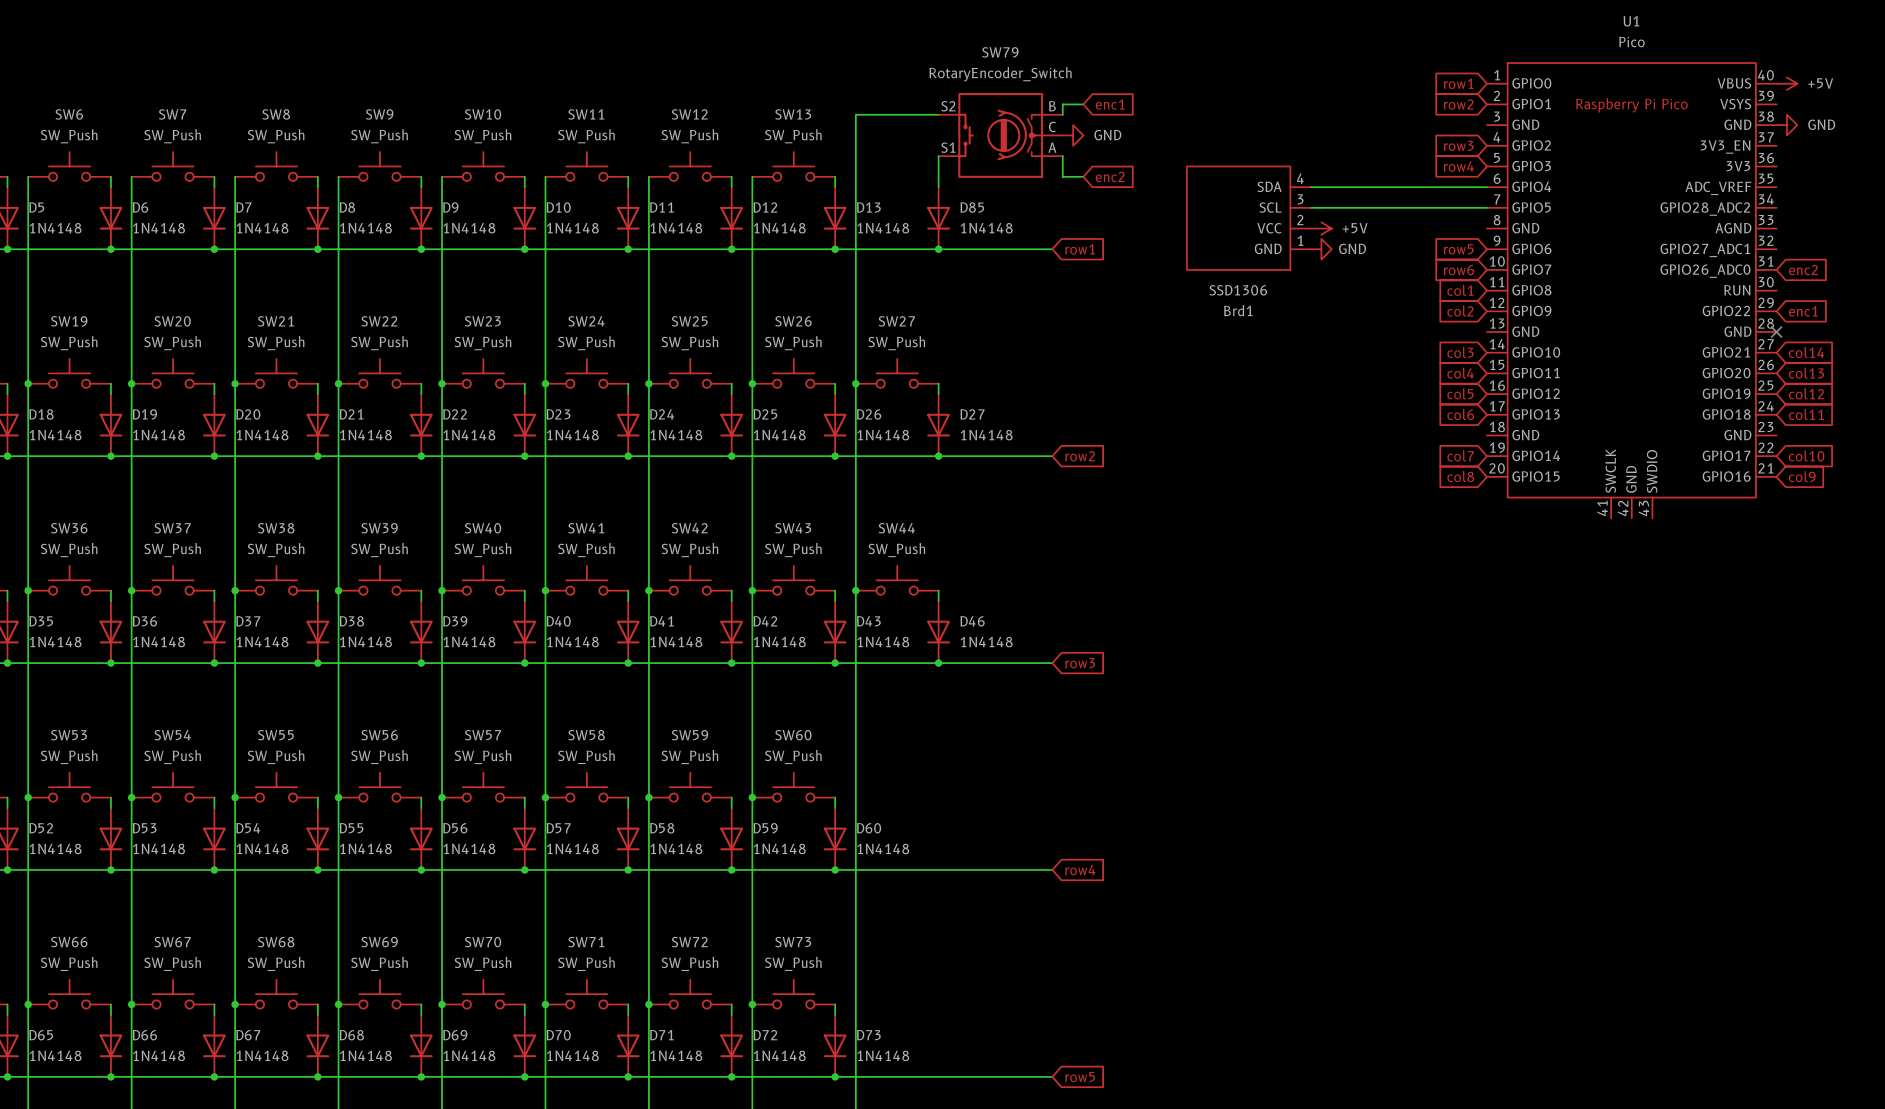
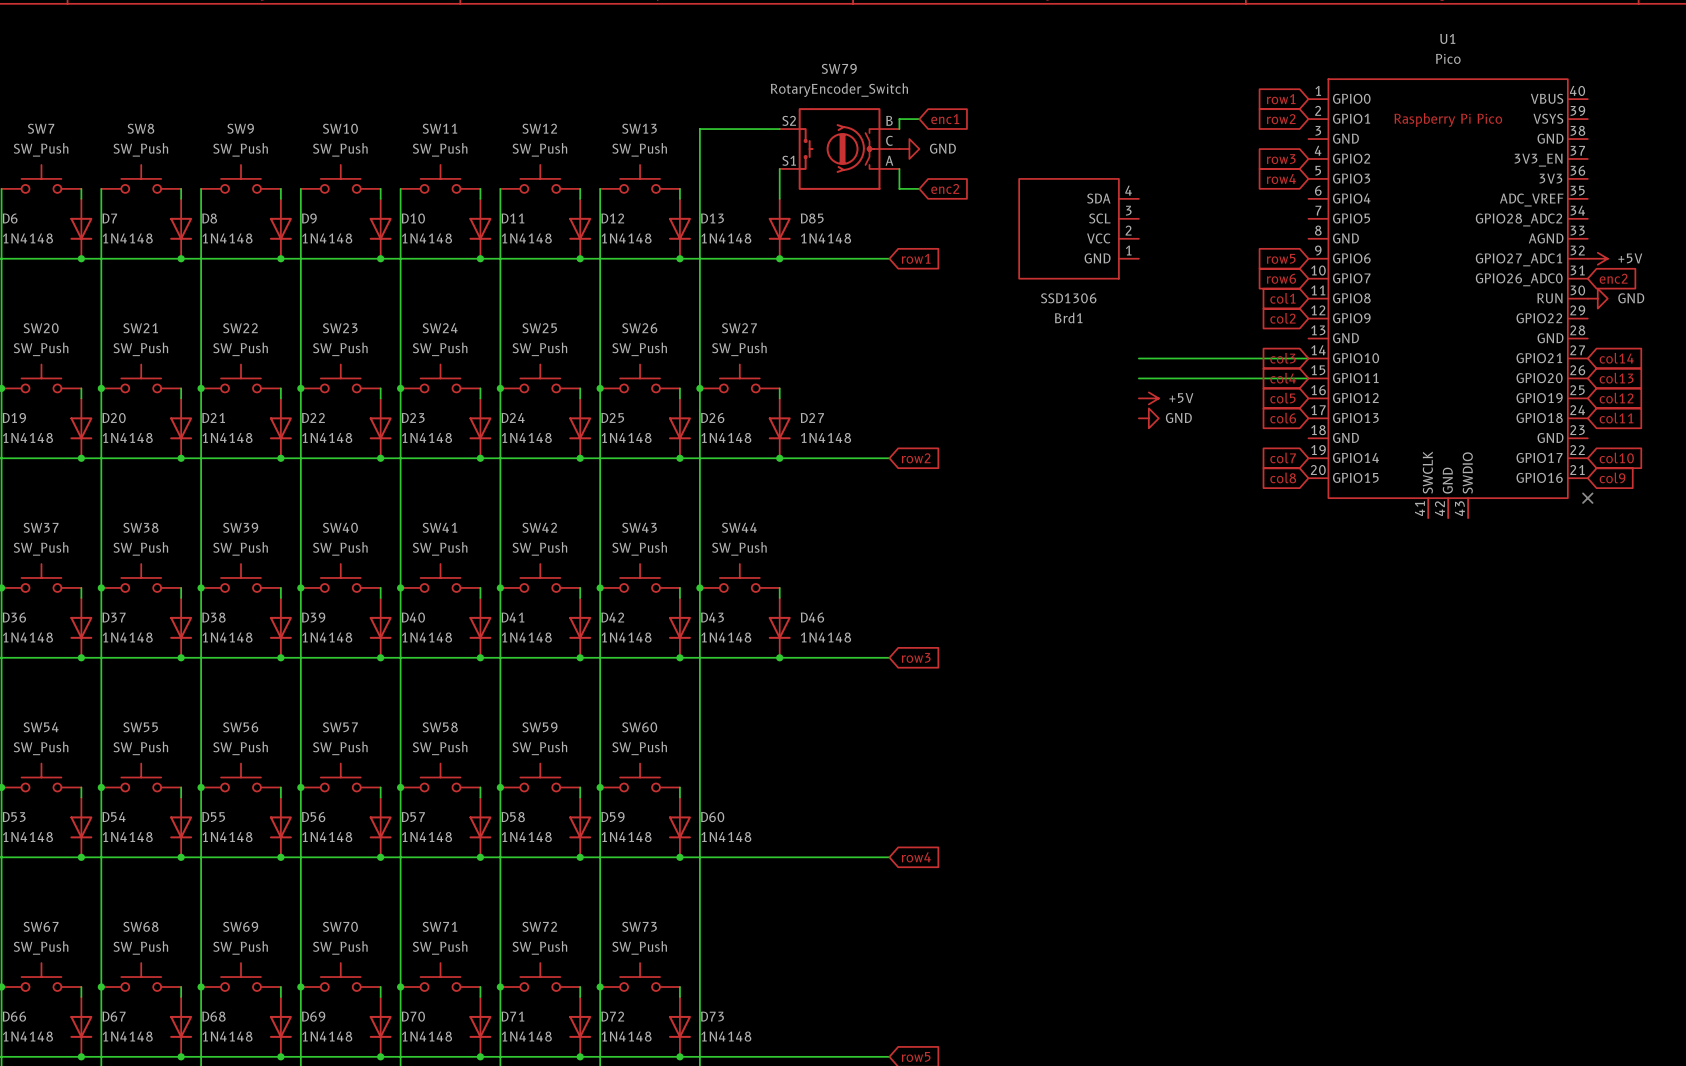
power symbol position: +5V (1786, 83) -> +5V (1597, 258)
power symbol position: GND (1786, 125) -> GND (1597, 298)
wire: (1311, 187) (1486, 187) -> (1138, 358) (1308, 358)
wire: (1311, 207) (1486, 207) -> (1138, 378) (1308, 378)
power symbol position: +5V (1321, 228) -> +5V (1148, 398)
power symbol position: GND (1321, 249) -> GND (1148, 418)
global label: enc1 (1803, 311) -> none
no-connect mark: (1776, 332) -> none
no-connect mark: none -> (1587, 498)

